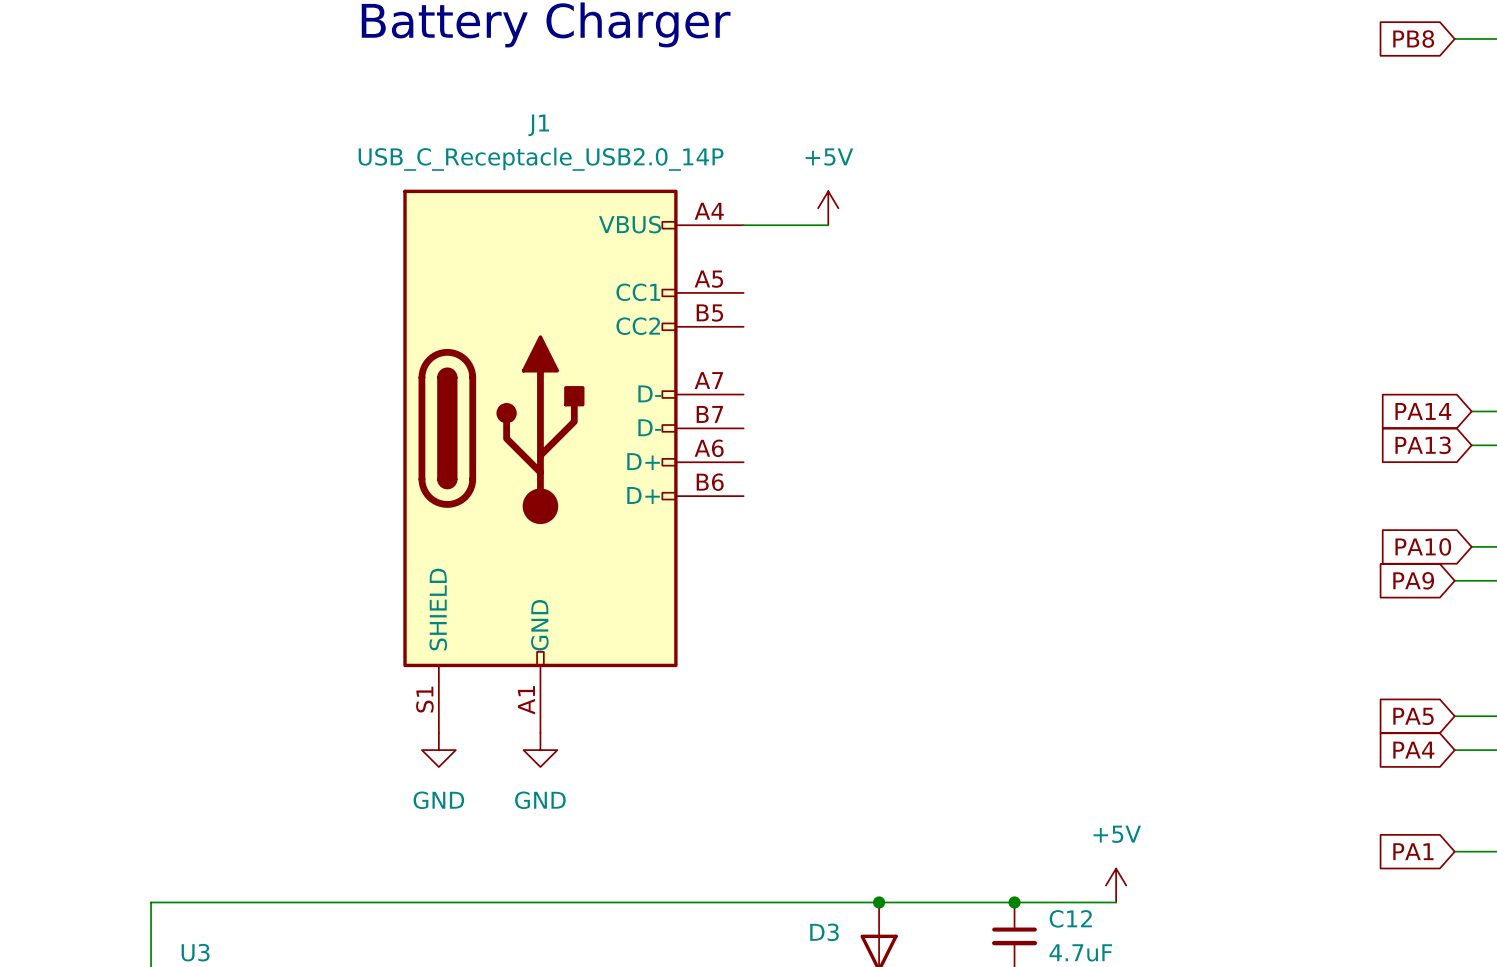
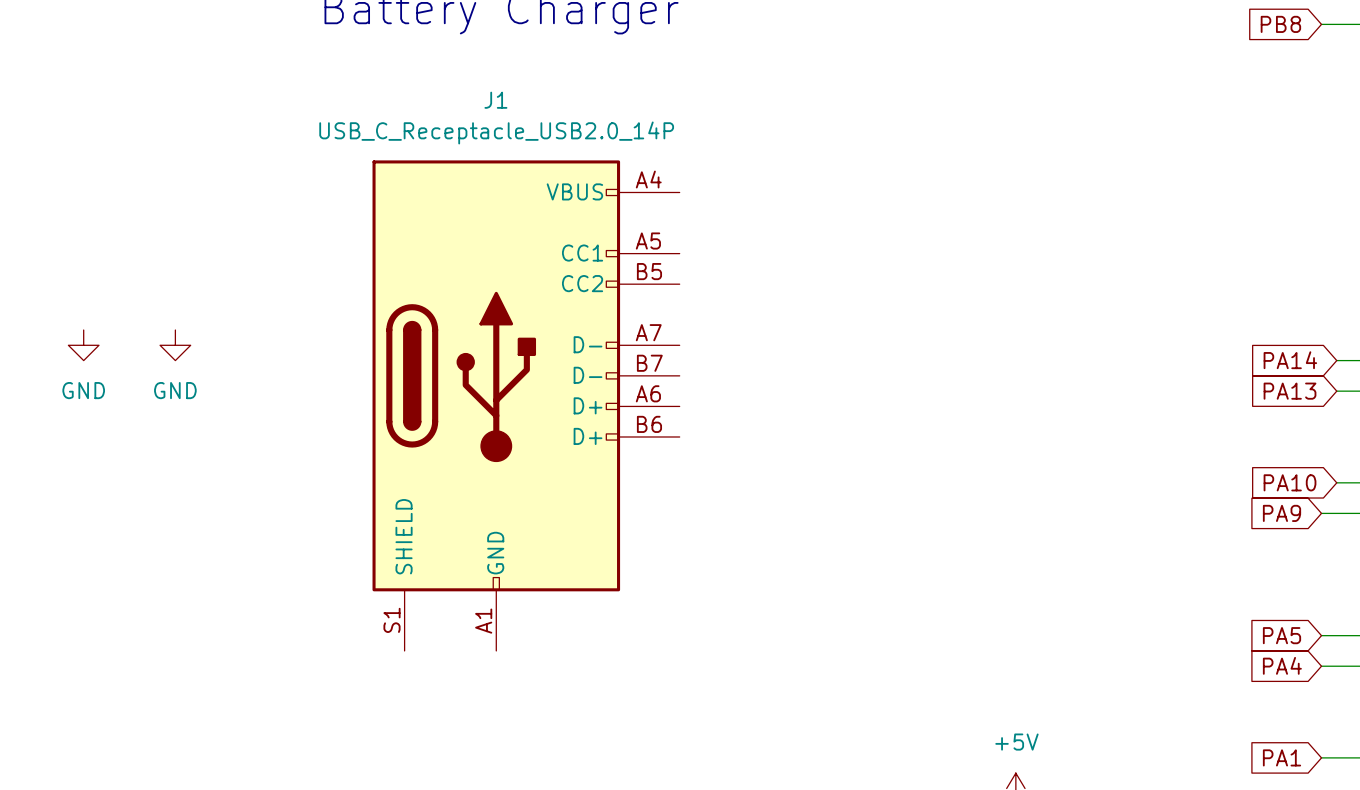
power symbol: +5V (828, 208) -> none
wire: (743, 225) (828, 225) -> none
power symbol: none -> GND (83, 345)
power symbol: none -> GND (175, 345)
power symbol: GND (438, 750) -> none
power symbol: GND (540, 750) -> none

